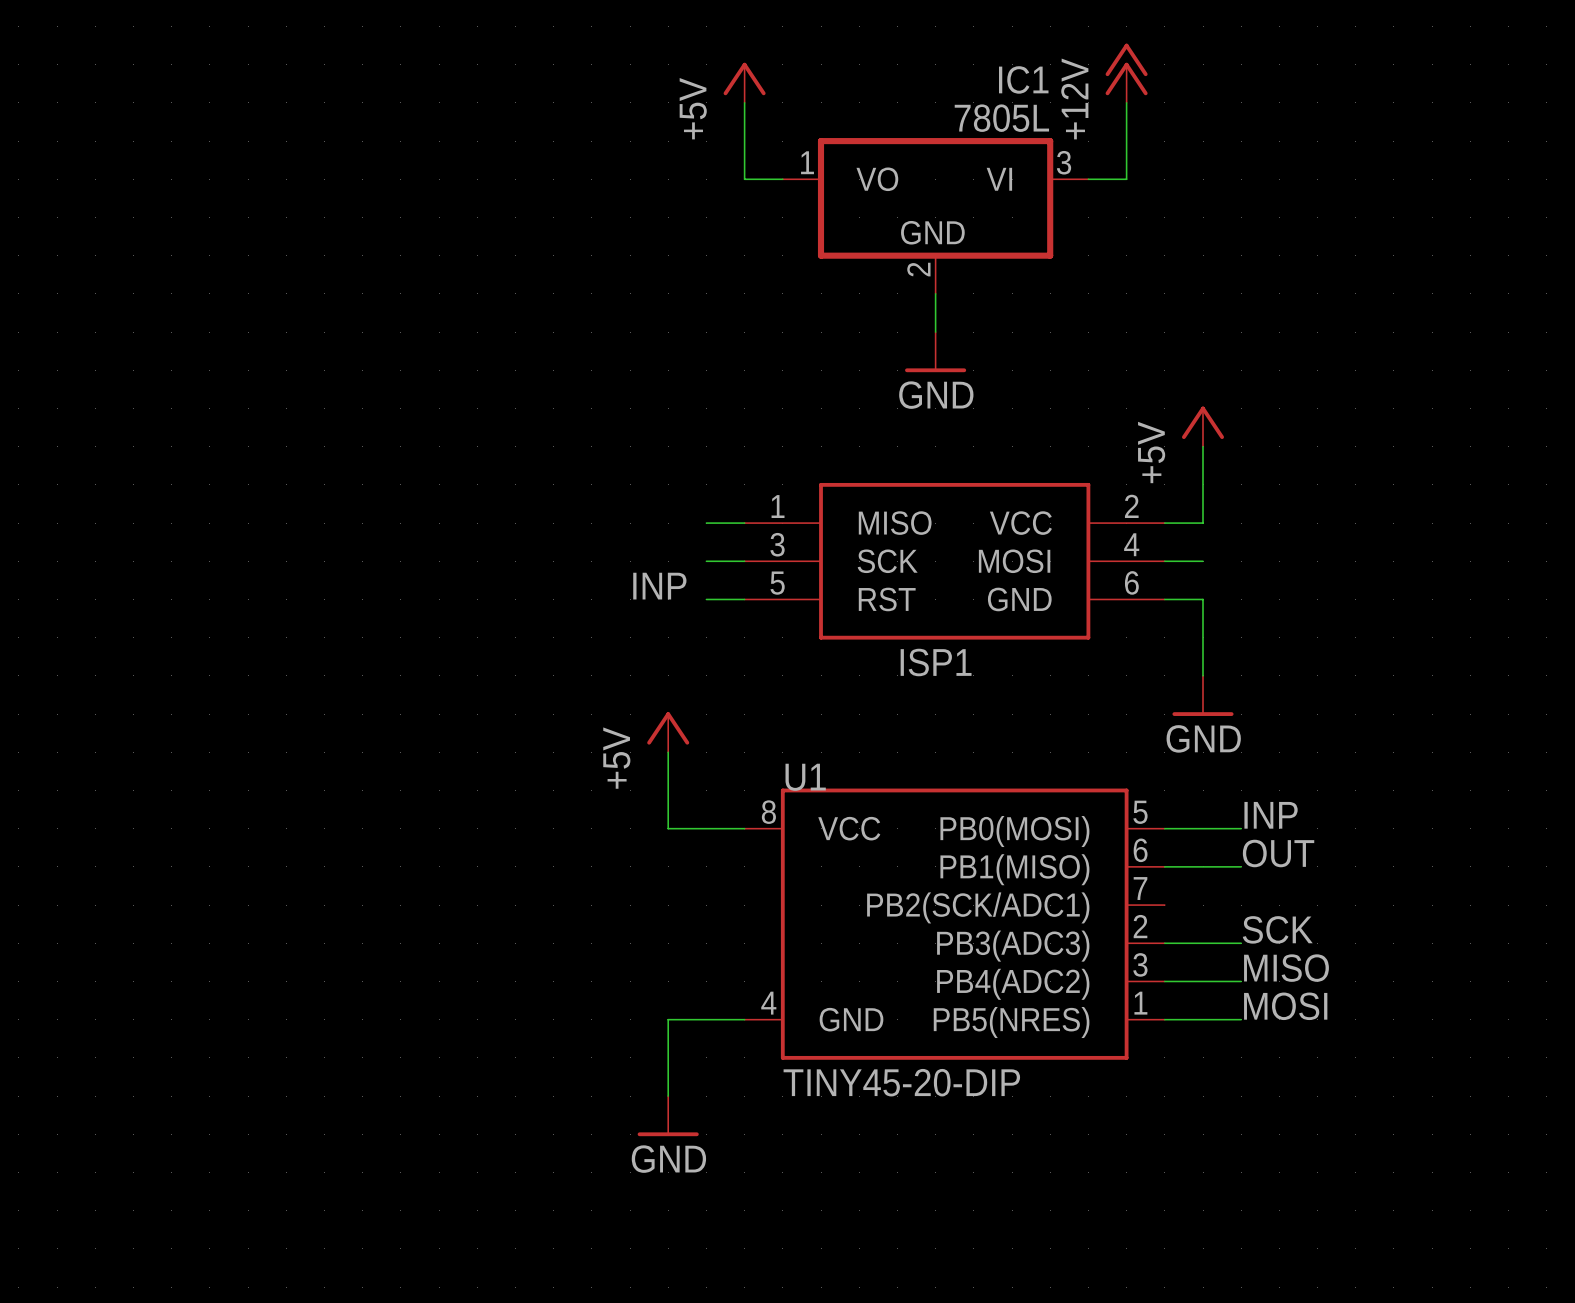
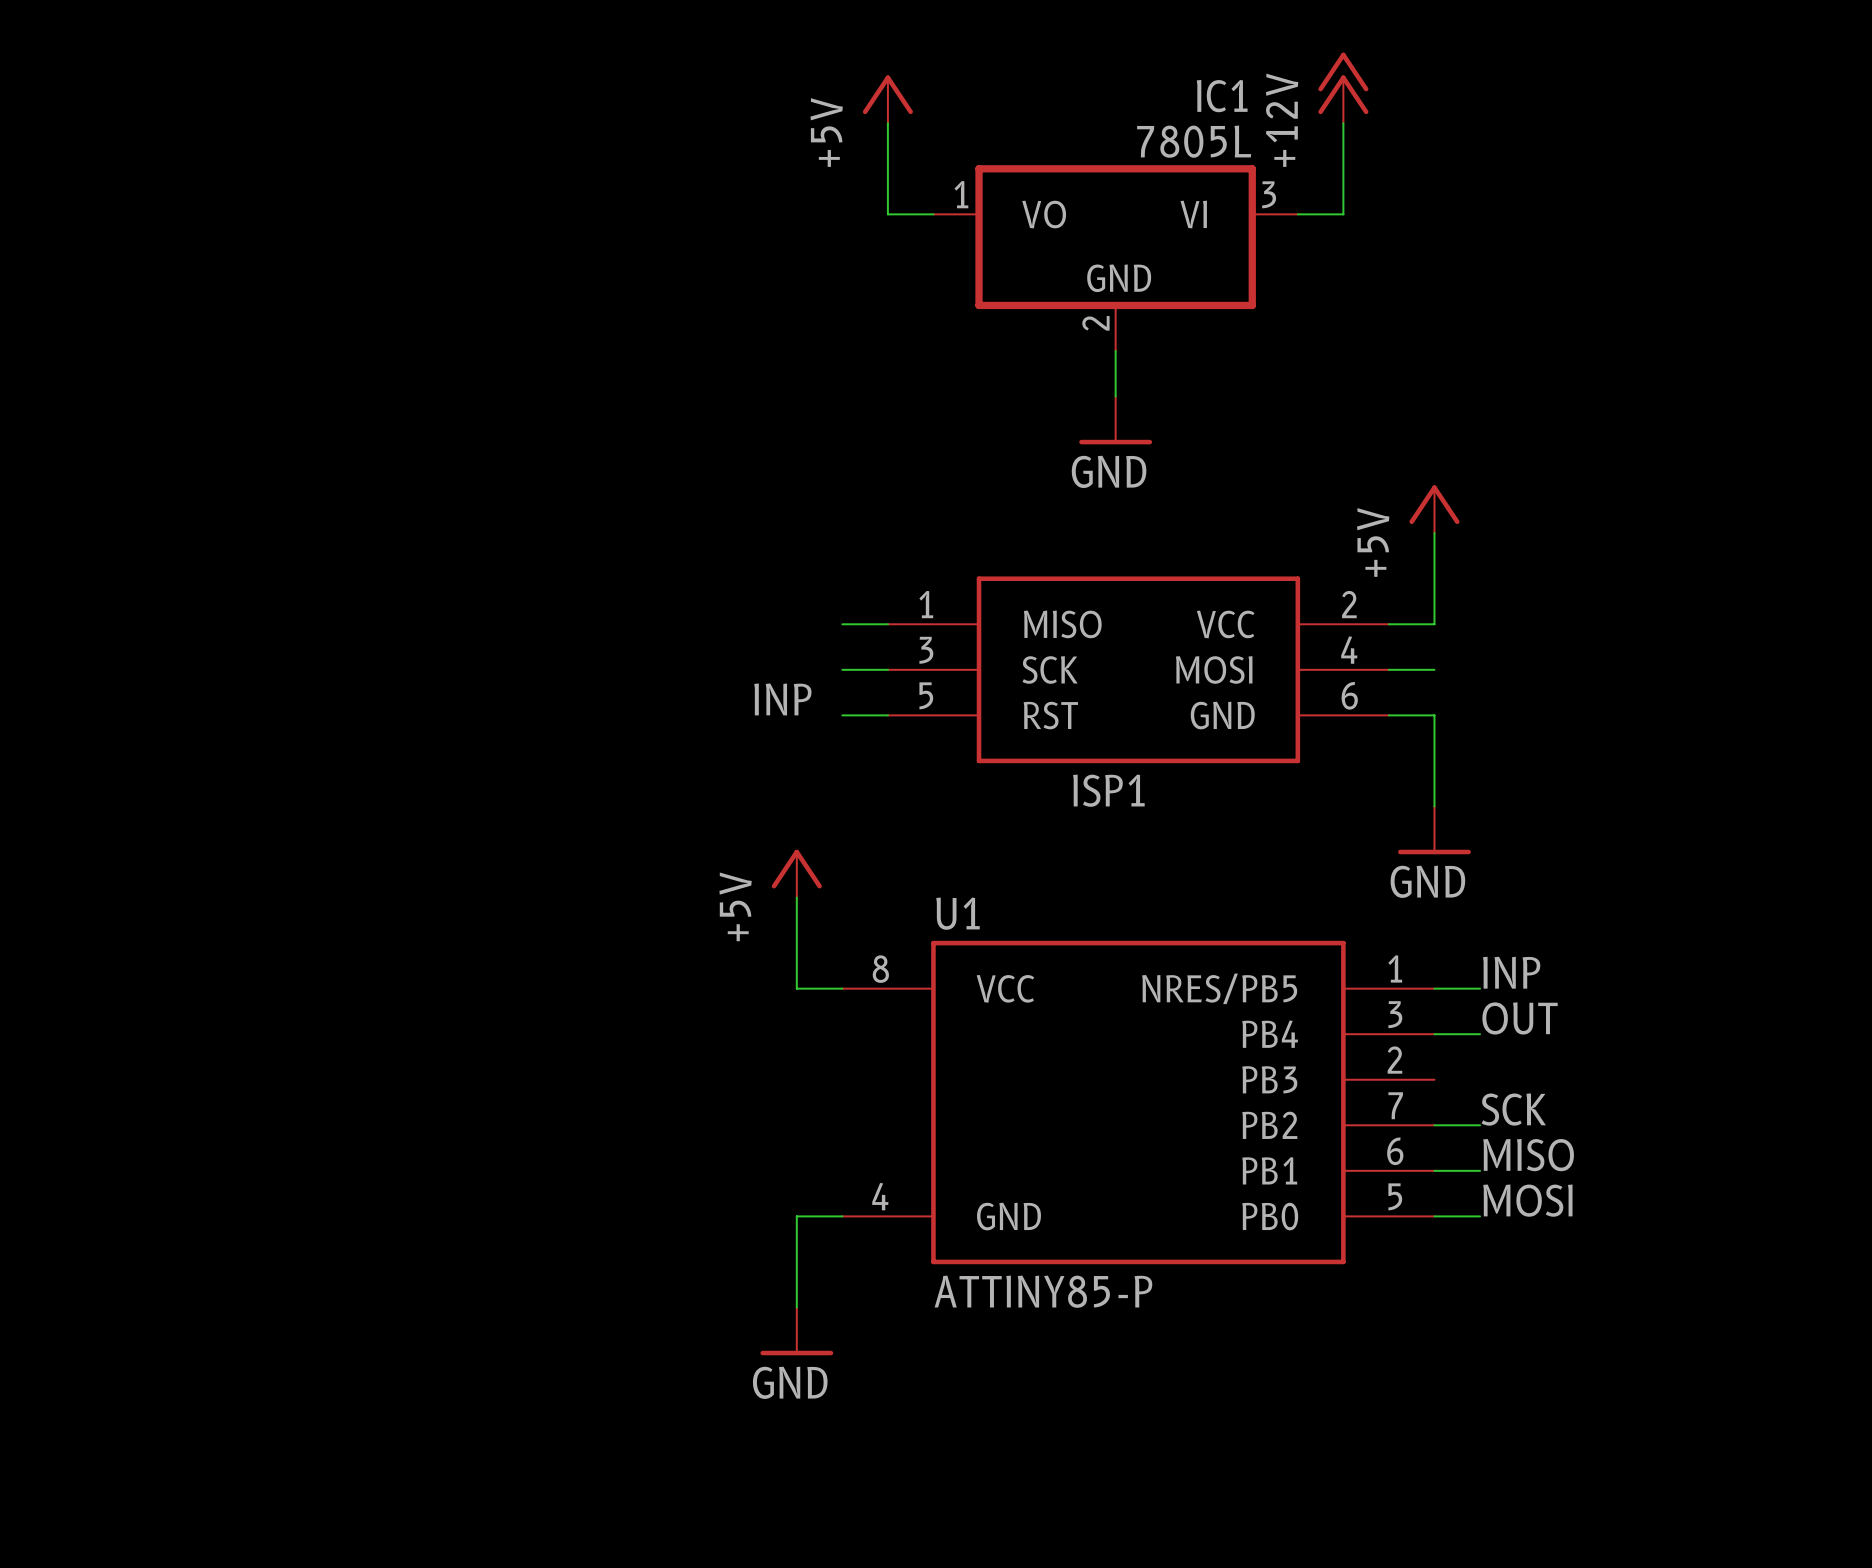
U1 symbol: [744, 788, 1165, 1060] -> [842, 940, 1435, 1265]
U1 value: TINY45-20-DIP (901, 1082) -> ATTINY85-P (1043, 1291)

